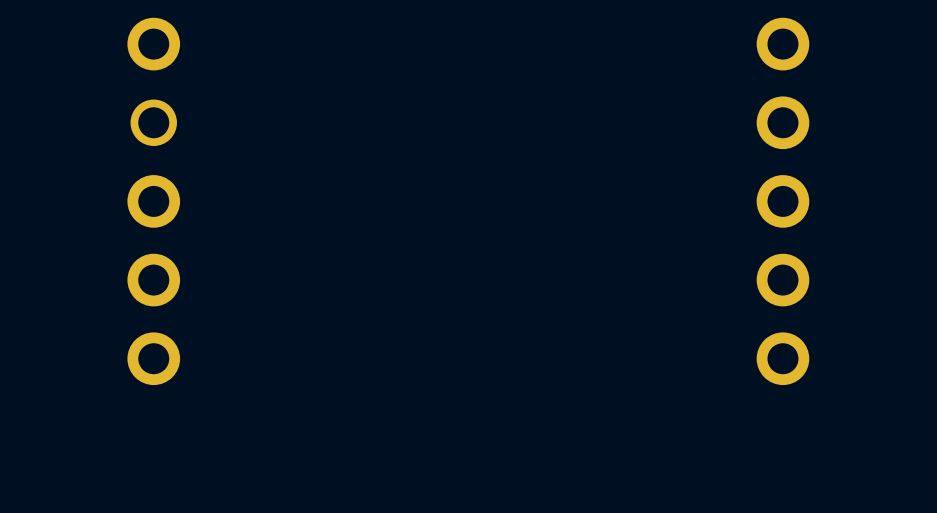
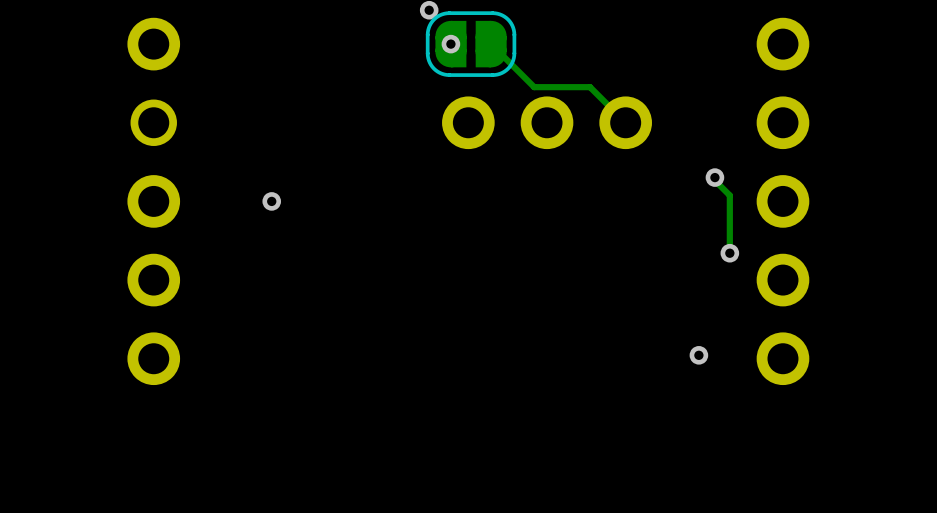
via: none -> (429, 10)
via: none -> (450, 44)
part: none -> (471, 44)
track: none -> (491, 59) (491, 44) (534, 87) (590, 87) (625, 122)
part: none -> (468, 122)
part: none -> (547, 122)
part: none -> (625, 122)
track: none -> (714, 177) (714, 180) (729, 195) (729, 253)
via: none -> (714, 177)
via: none -> (271, 201)
via: none -> (729, 253)
via: none -> (698, 355)

